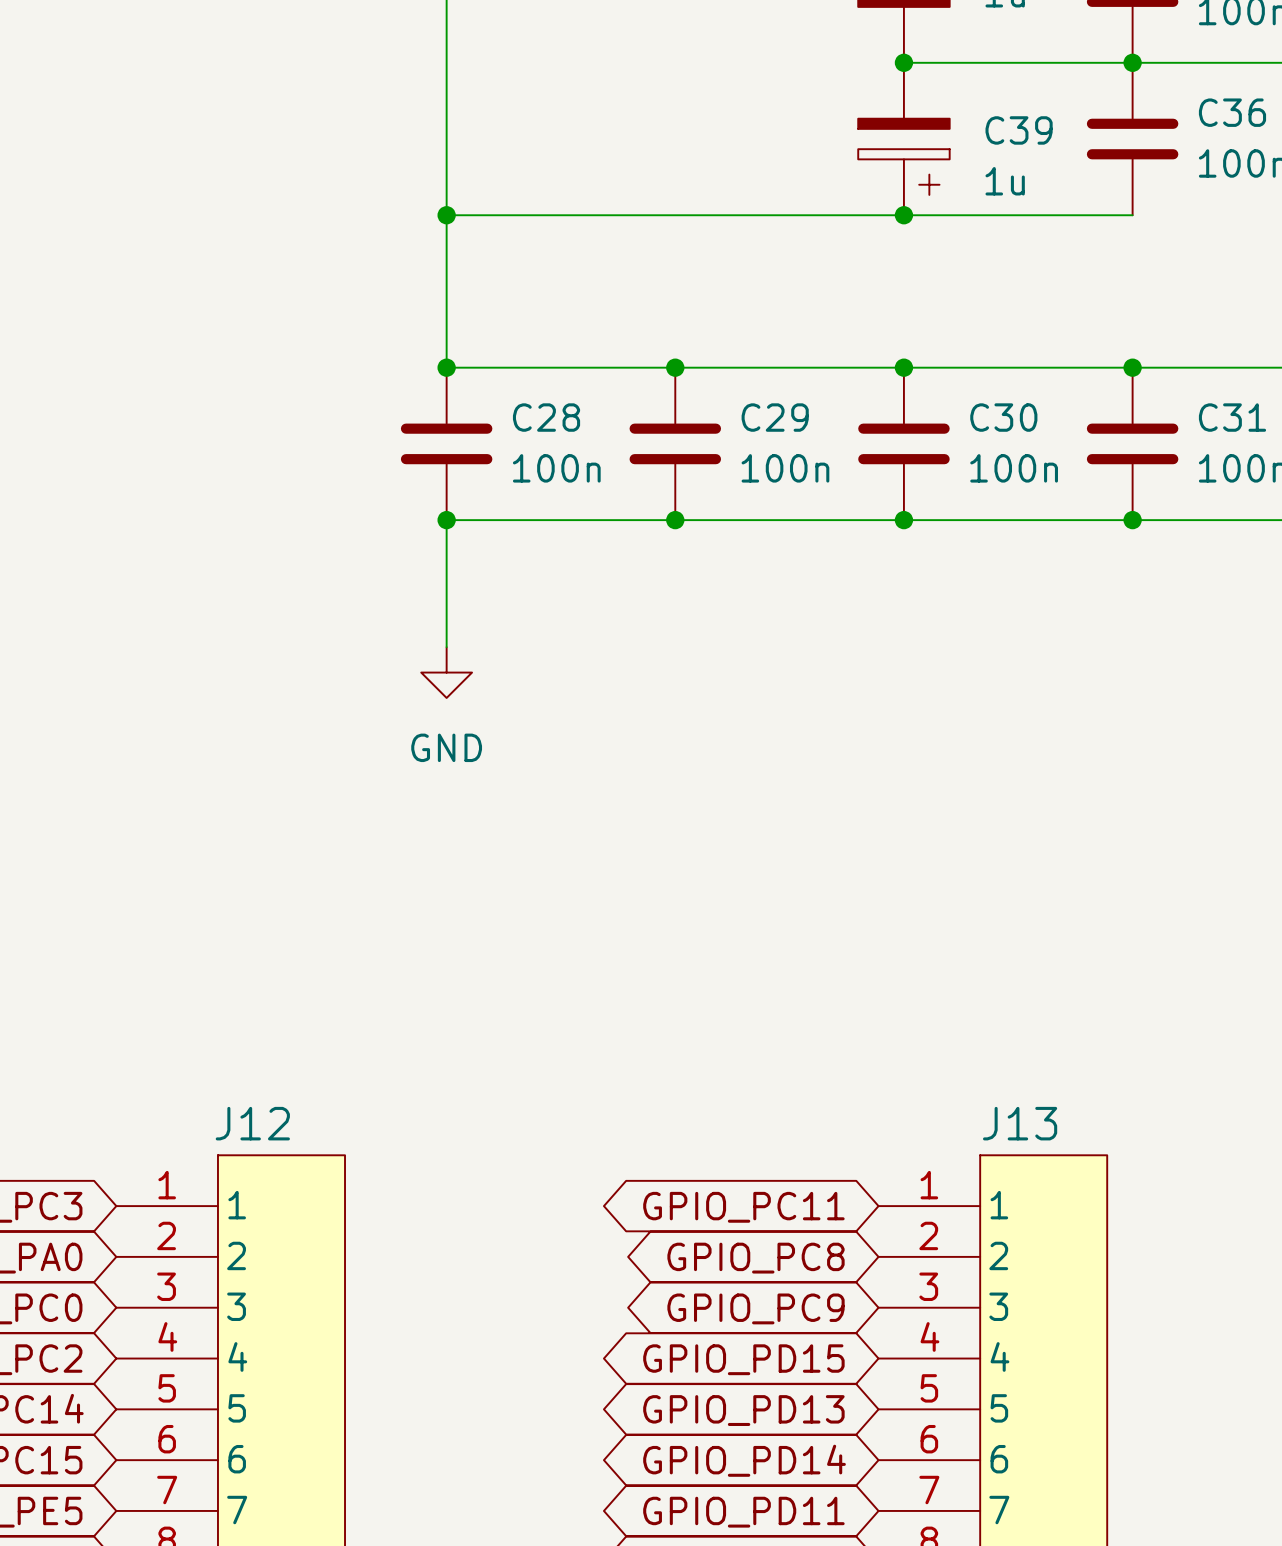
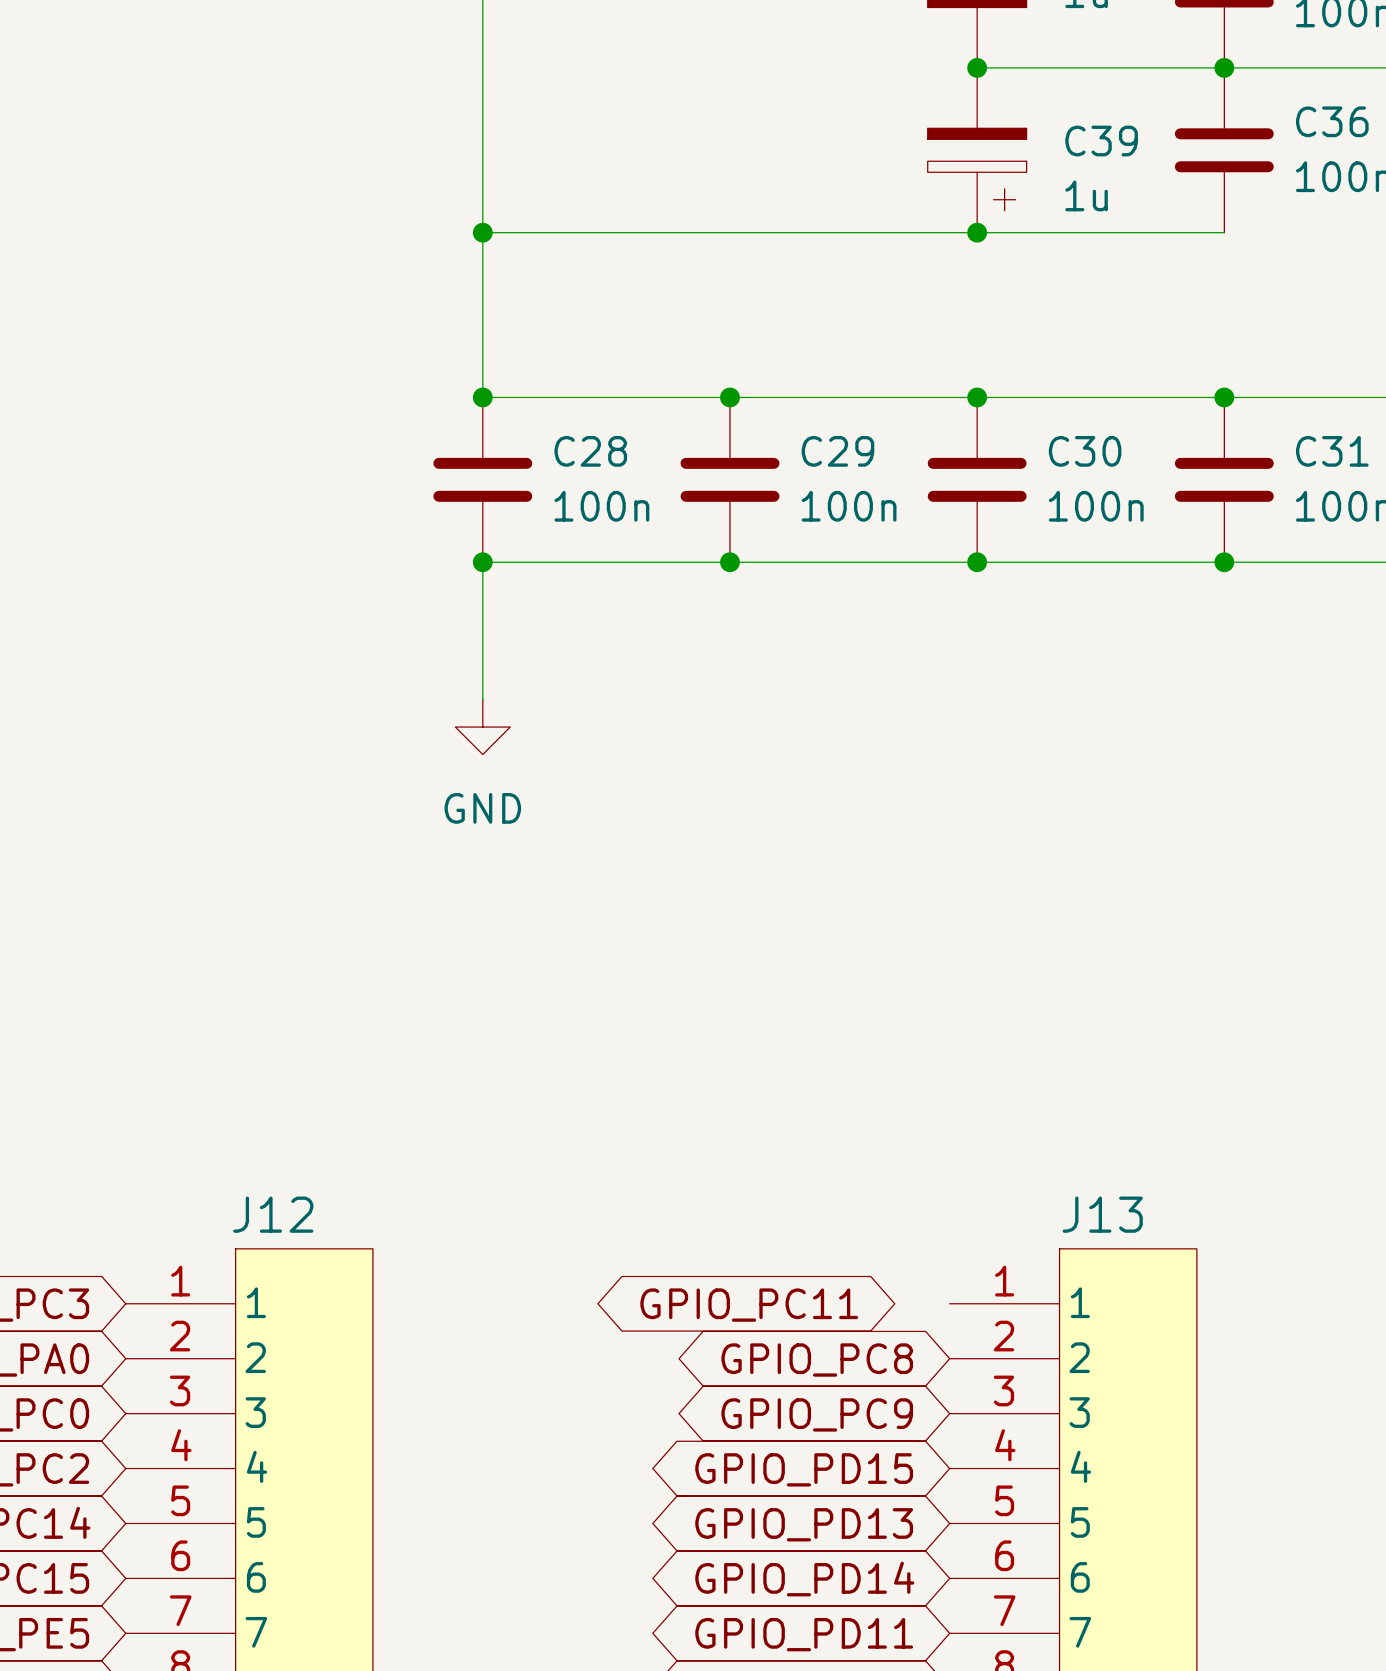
global label position: GPIO_PC11 (743, 1207) -> GPIO_PC11 (749, 1305)

